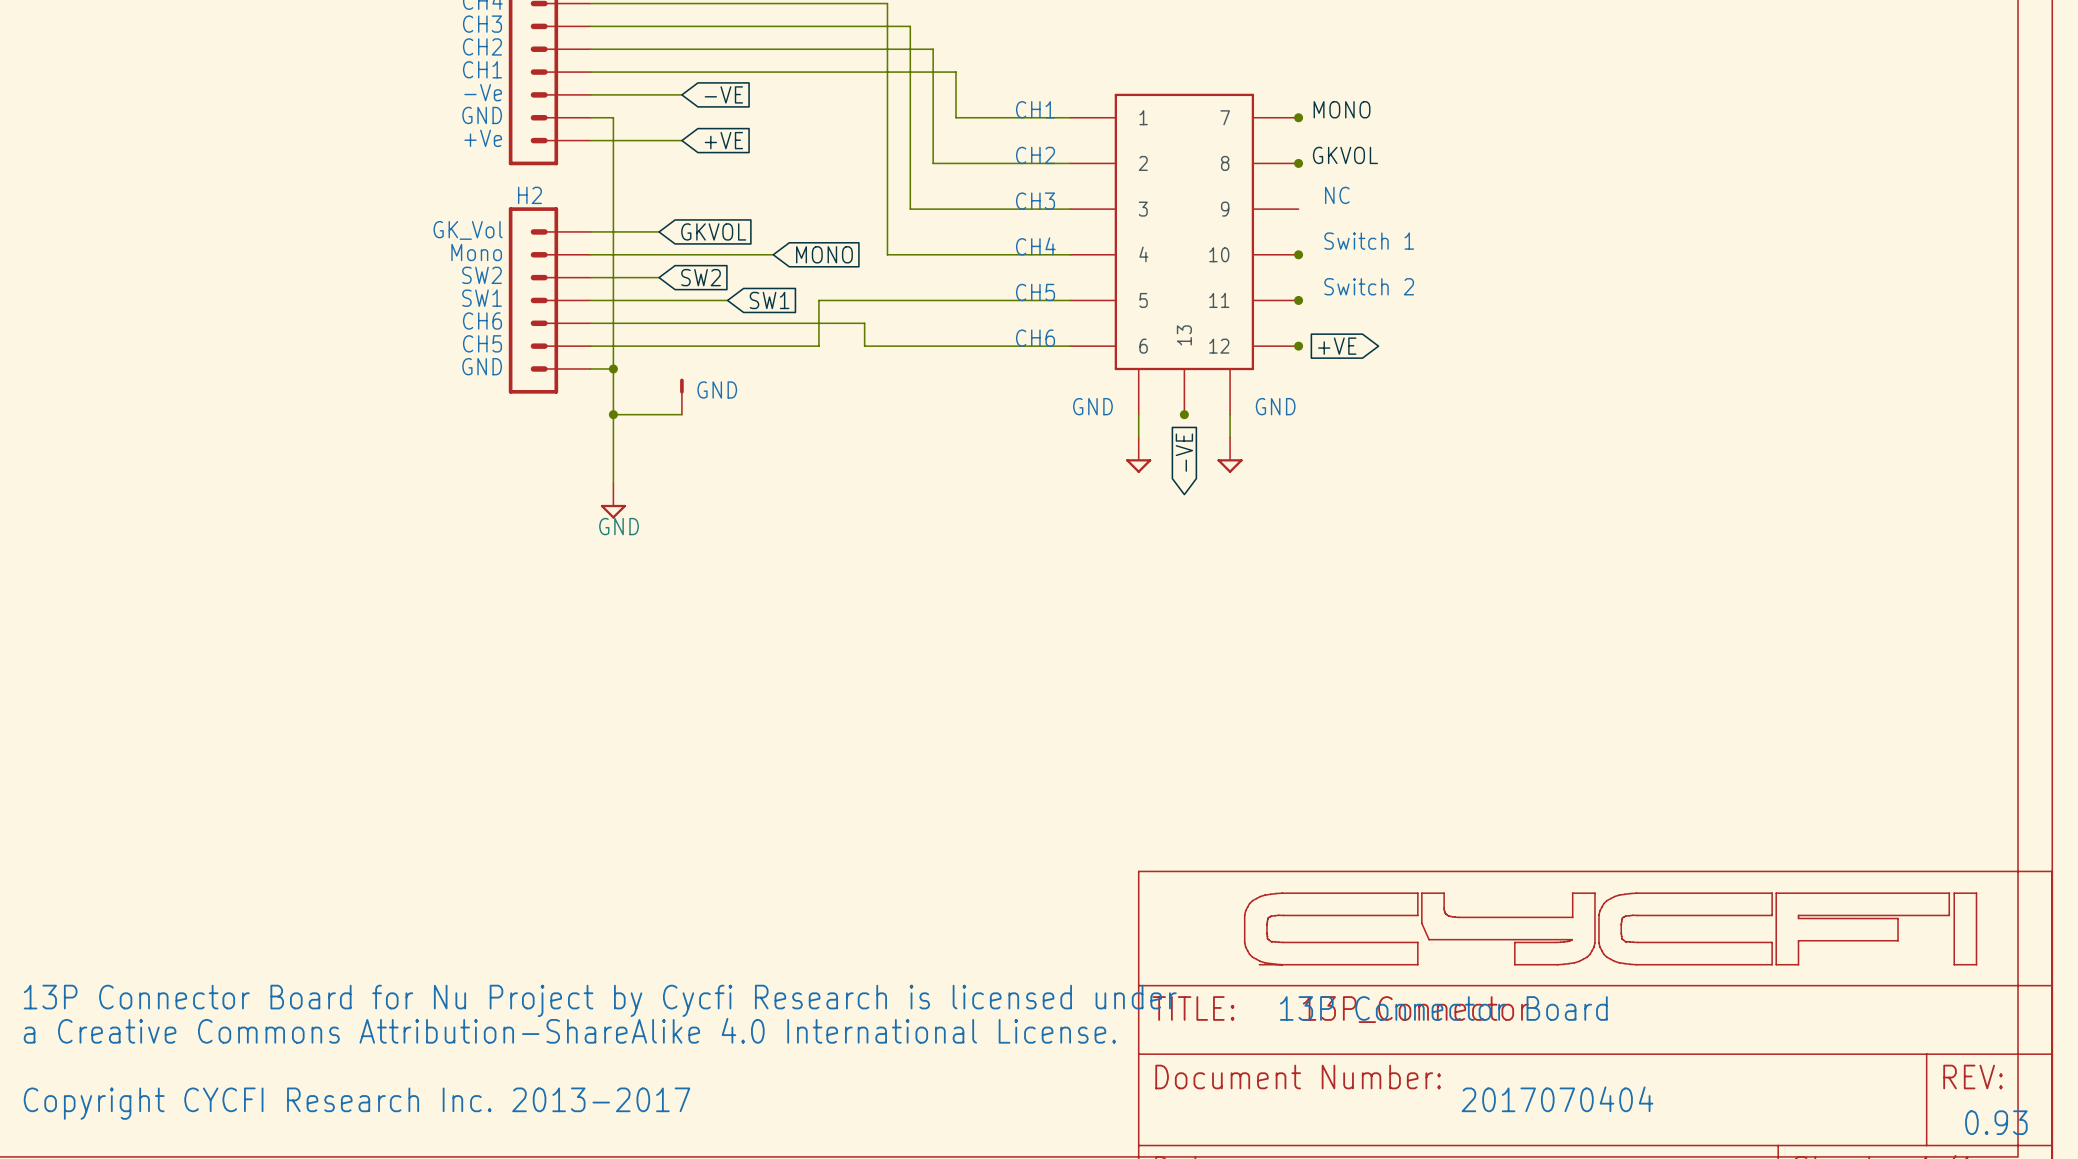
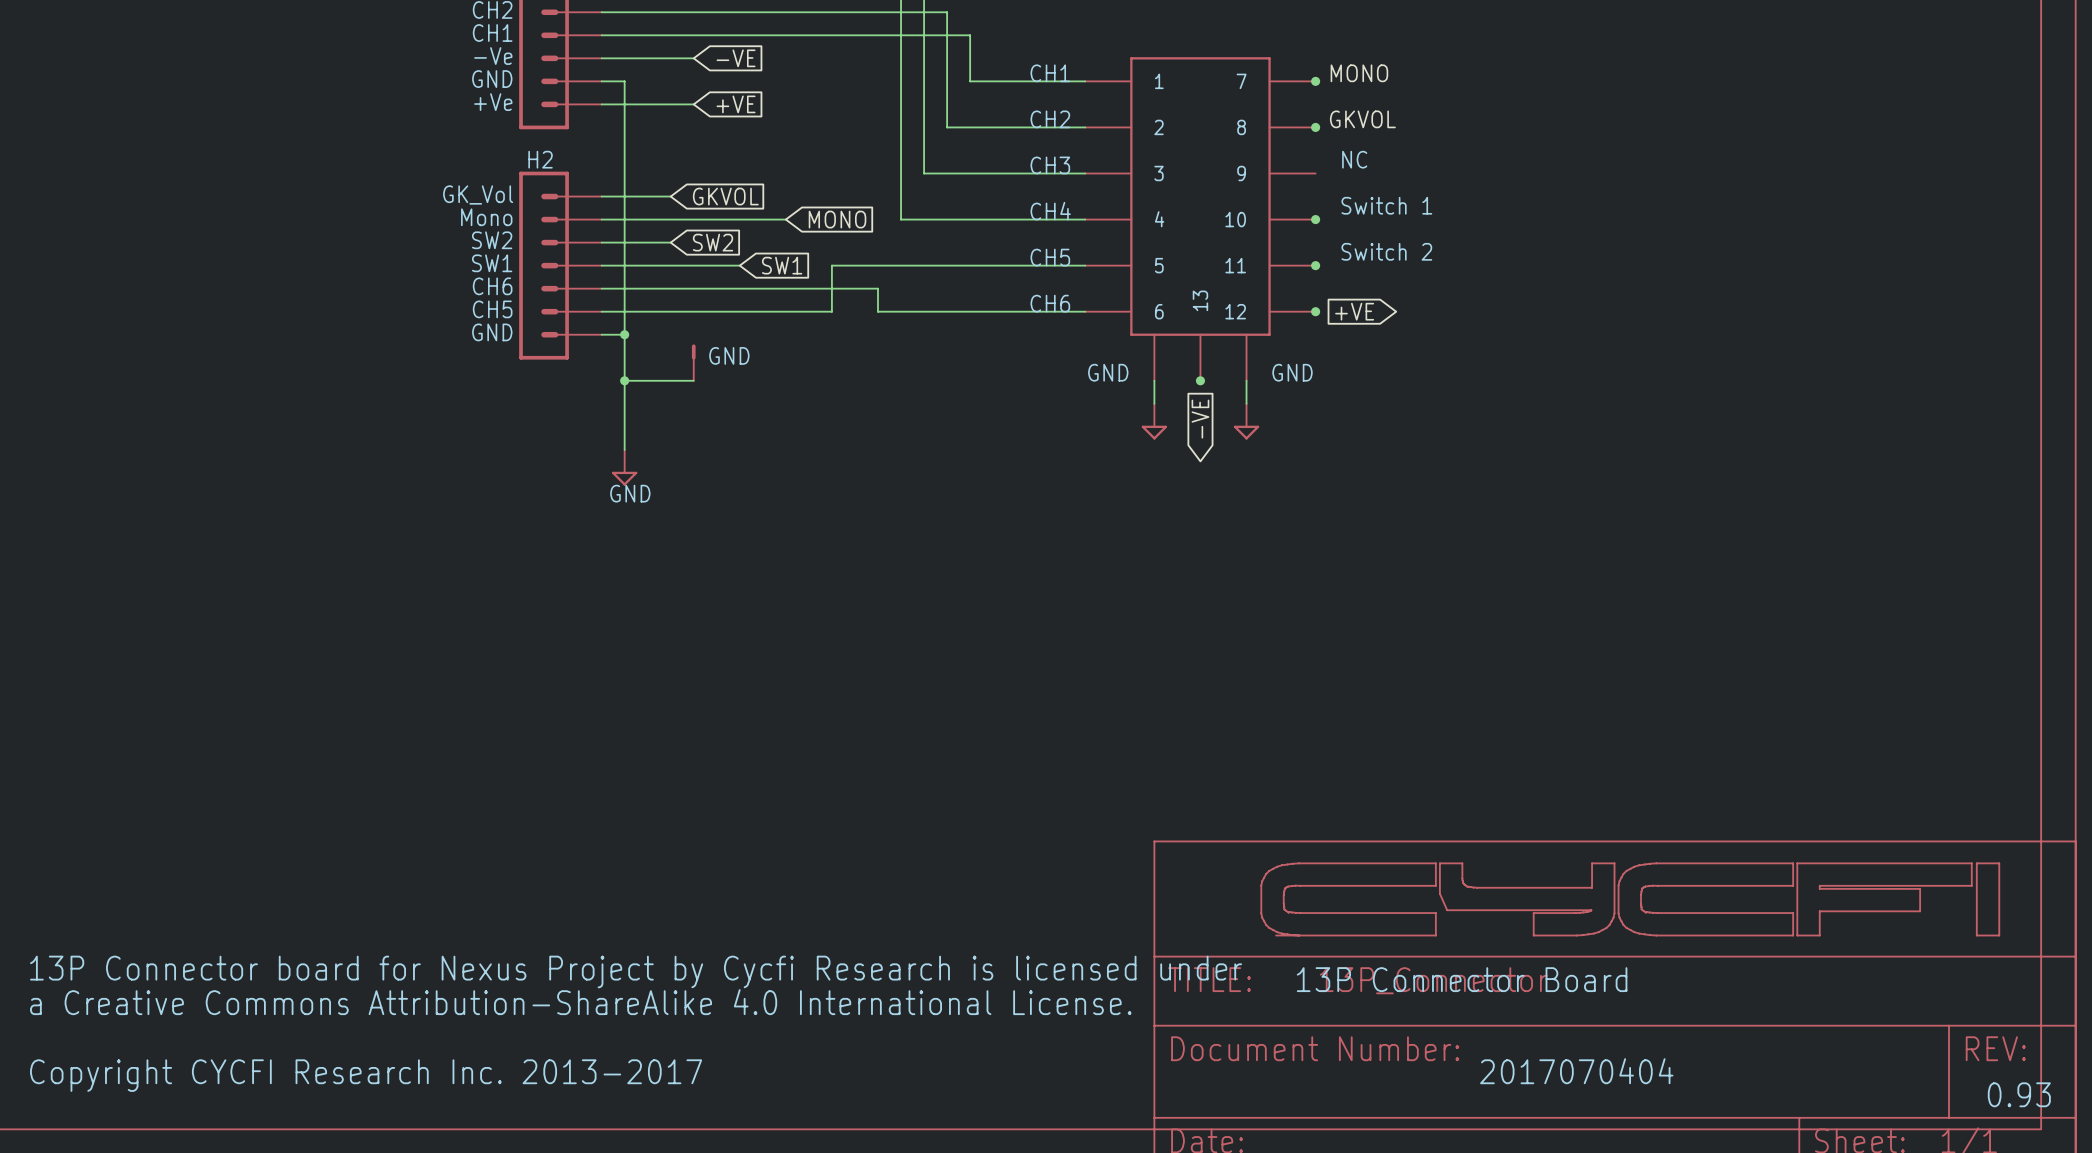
text: 13P Connector Board for Nu Project by Cycfi Research is licensed under (600, 1000) -> 13P Connector board for Nexus Project by Cycfi Research is licensed under (636, 971)

